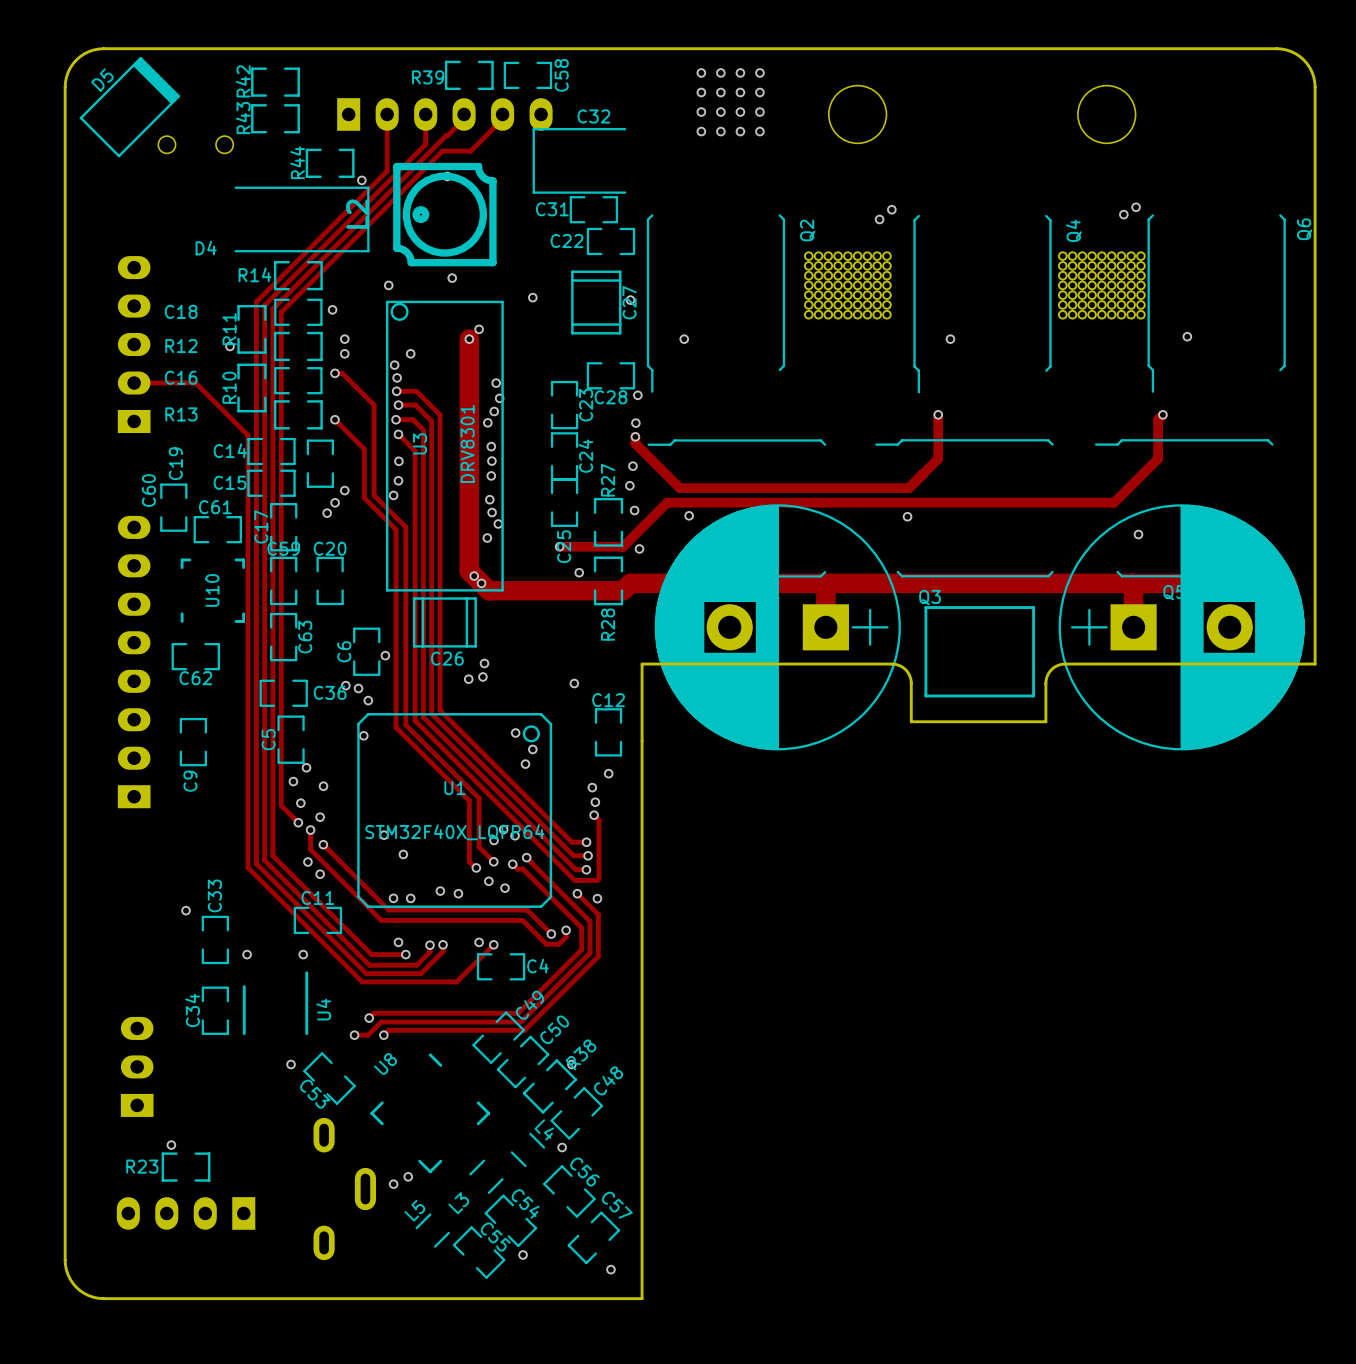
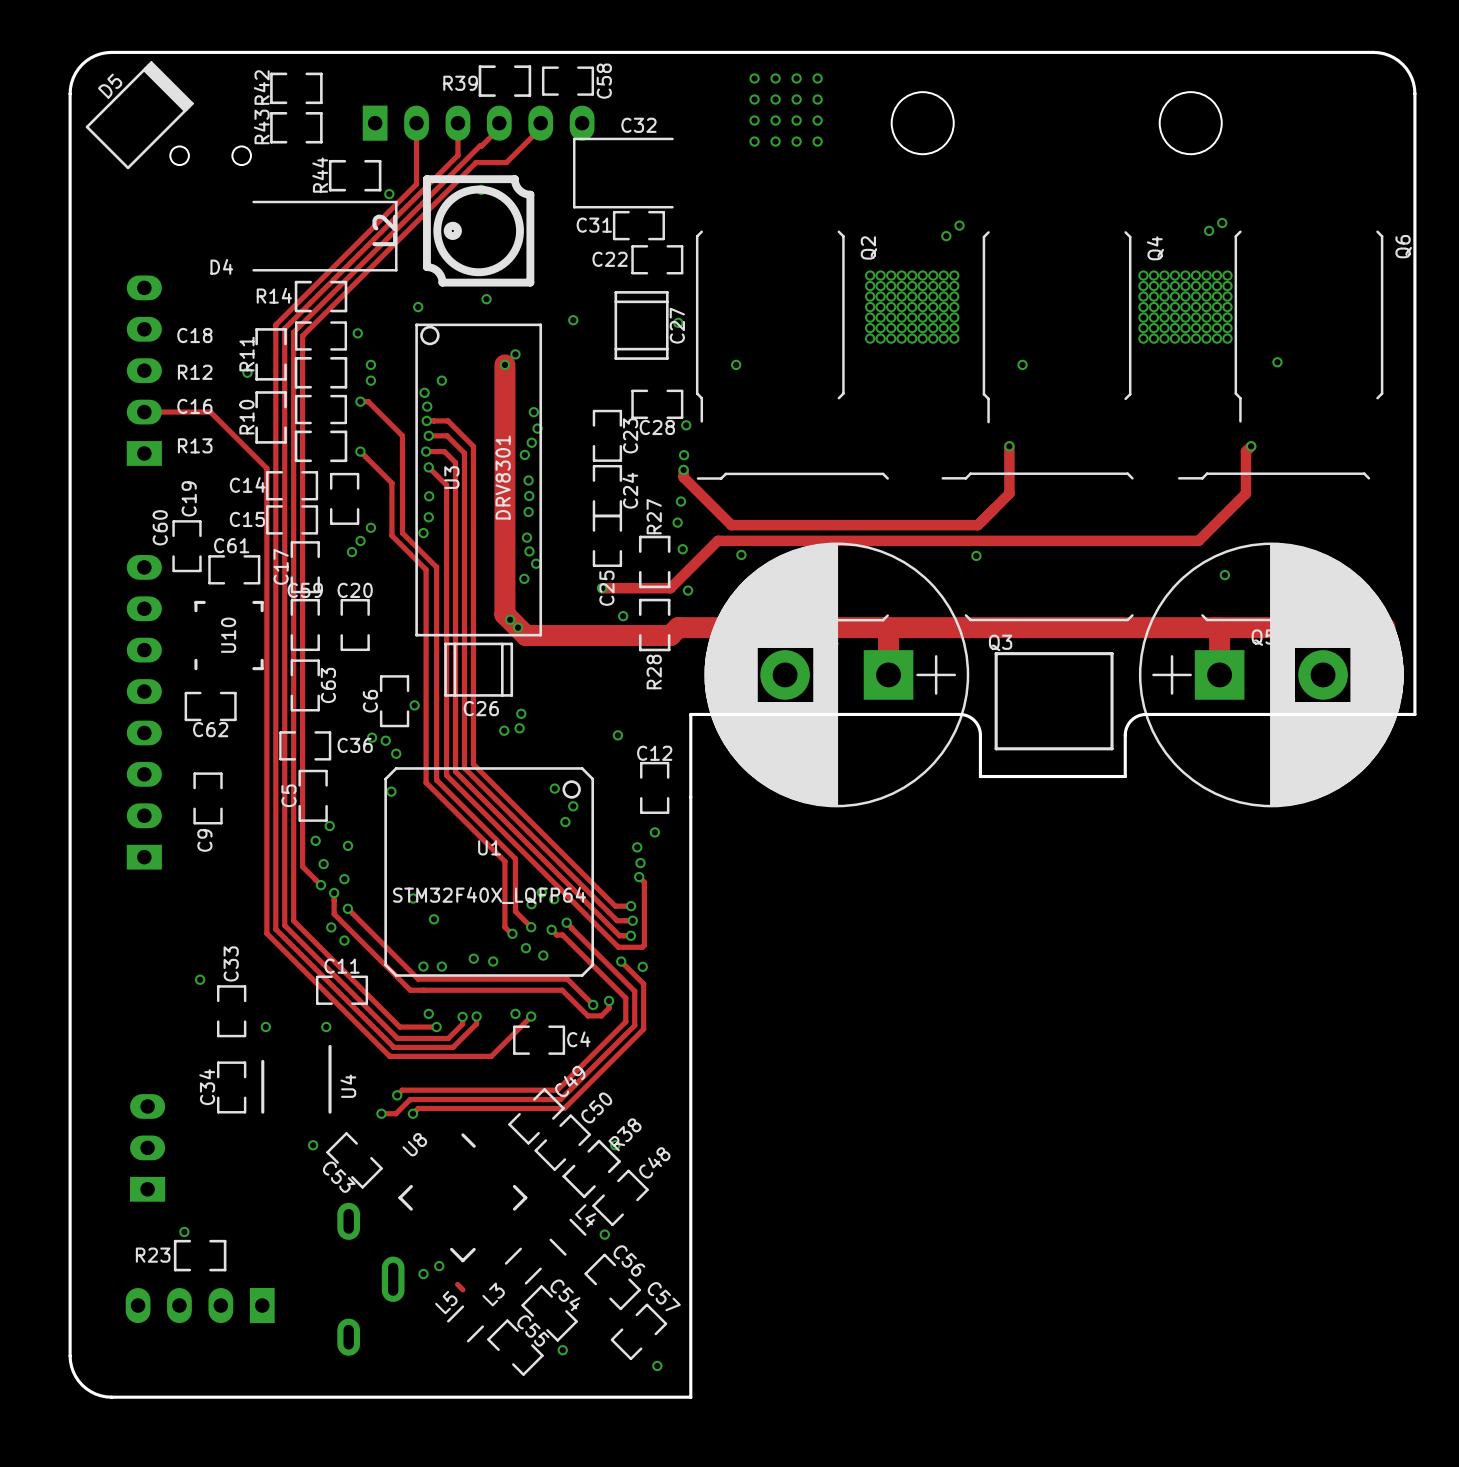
track: none -> (457, 1284) (462, 1289)

